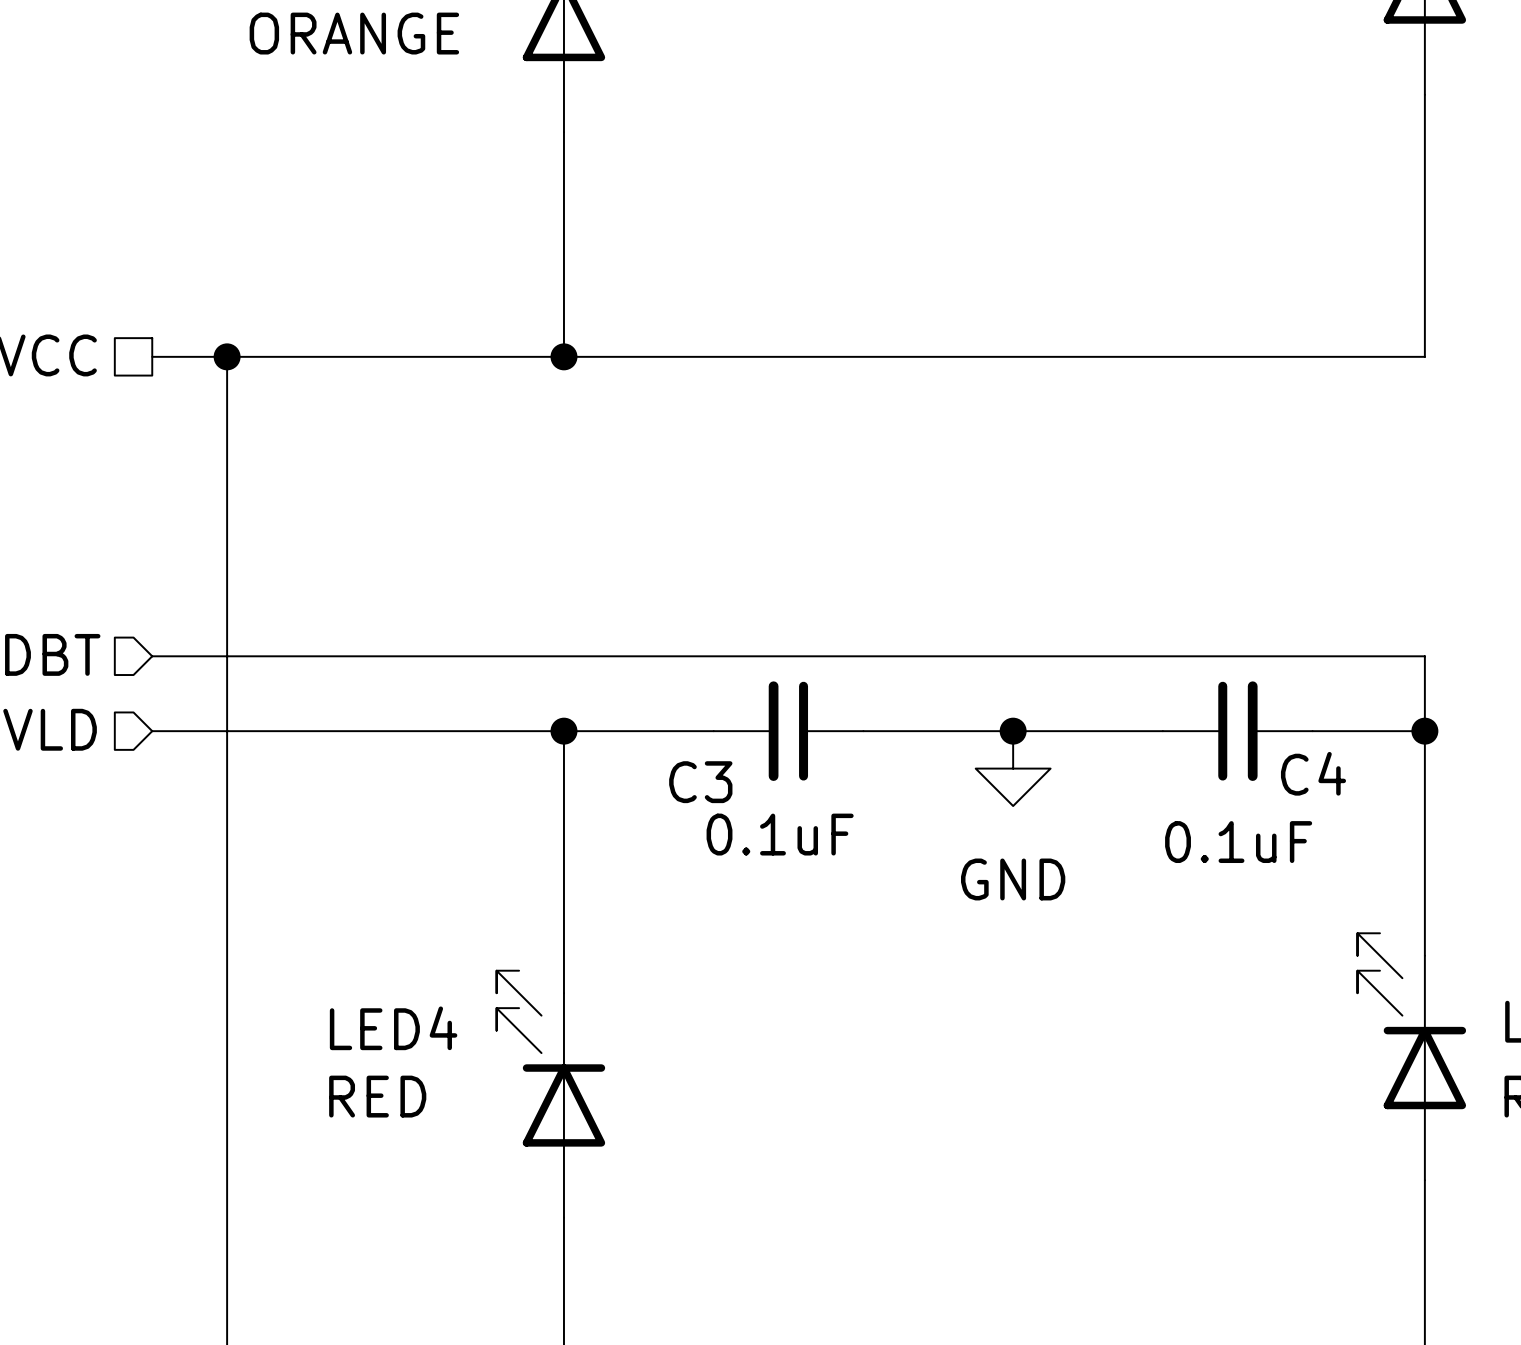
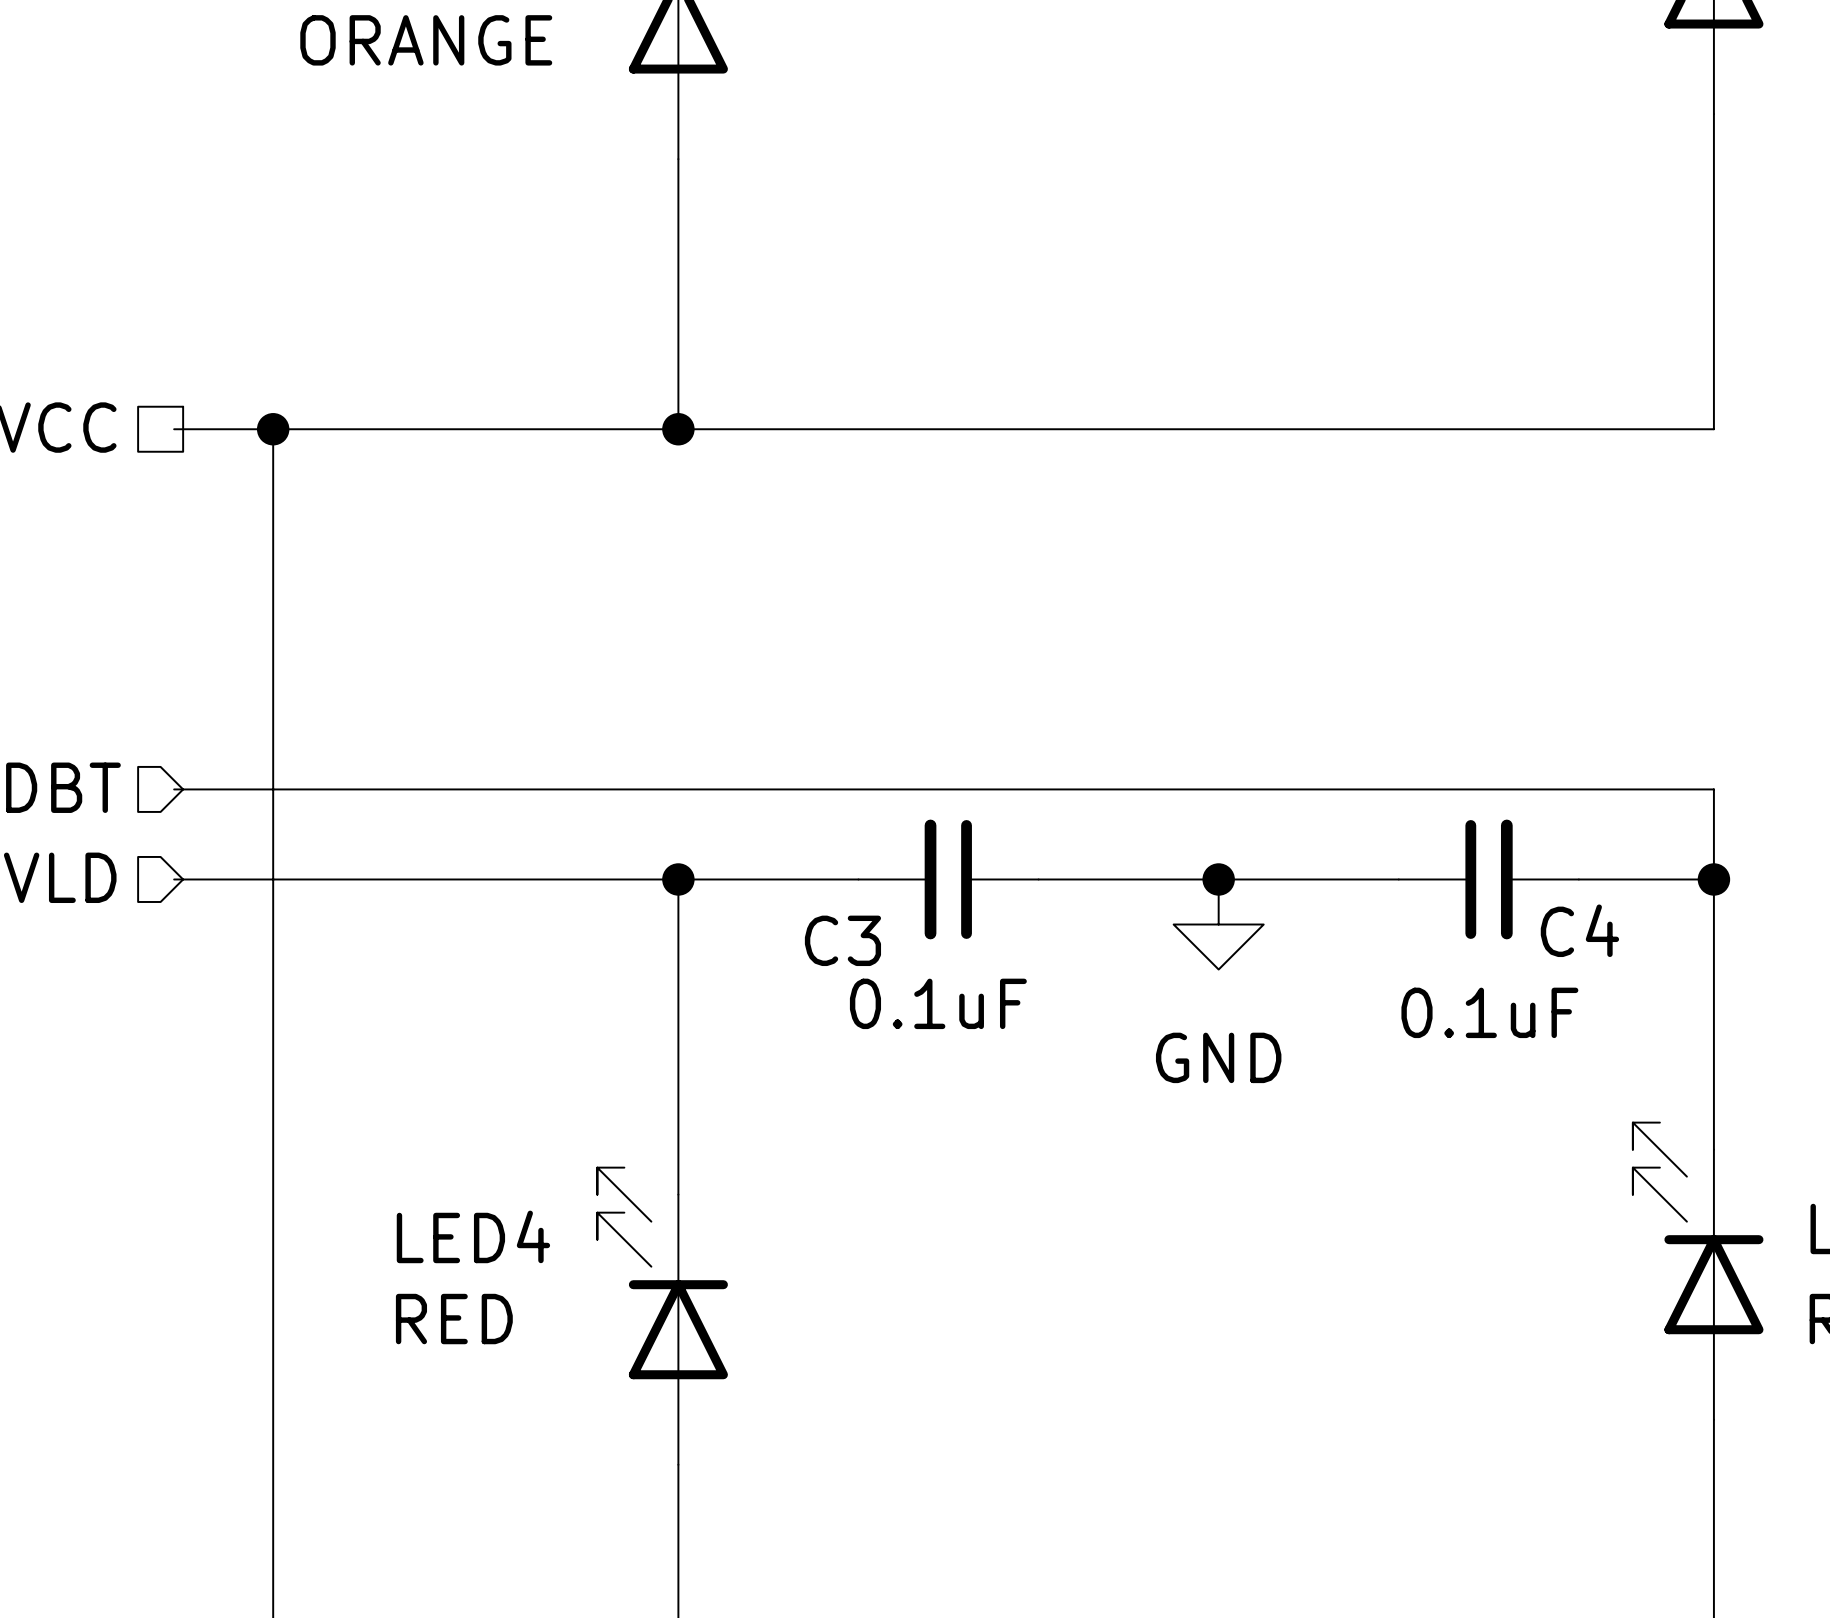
wire: none -> (174, 429) (183, 429)
wire: none -> (174, 789) (183, 789)
wire: none -> (174, 879) (183, 879)

